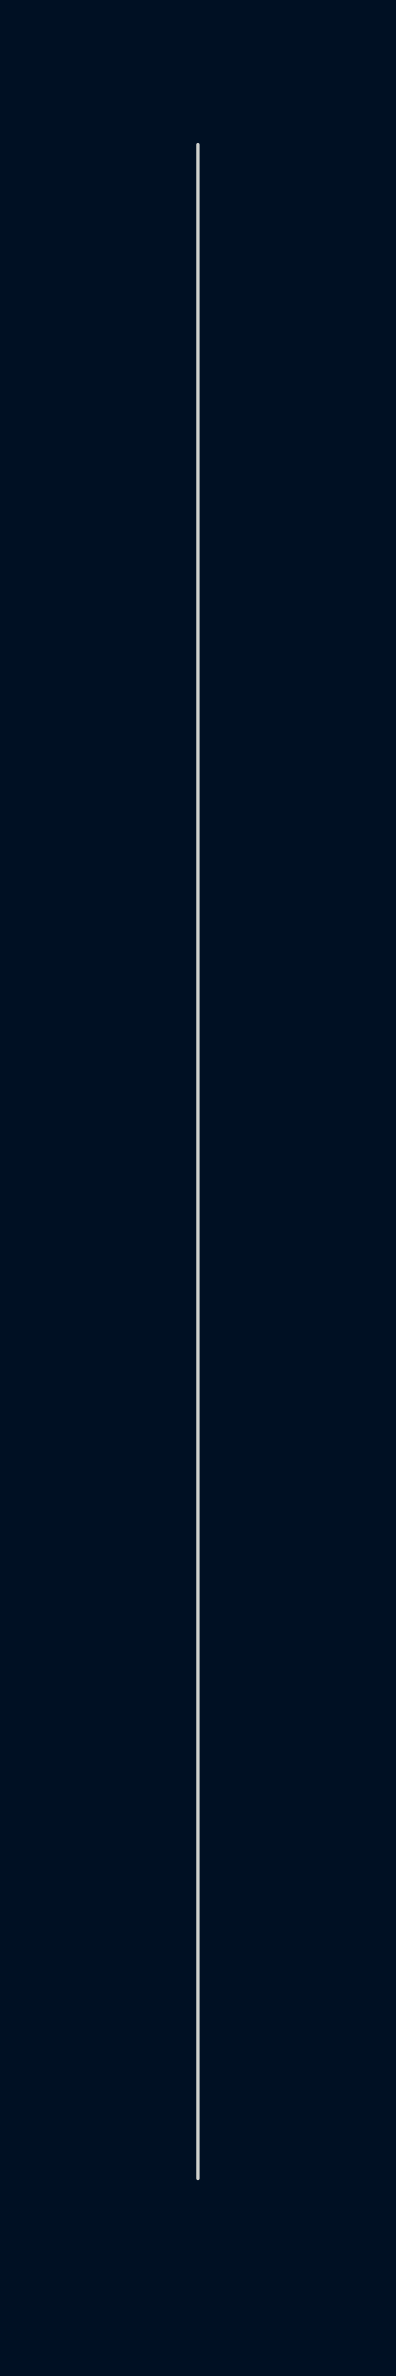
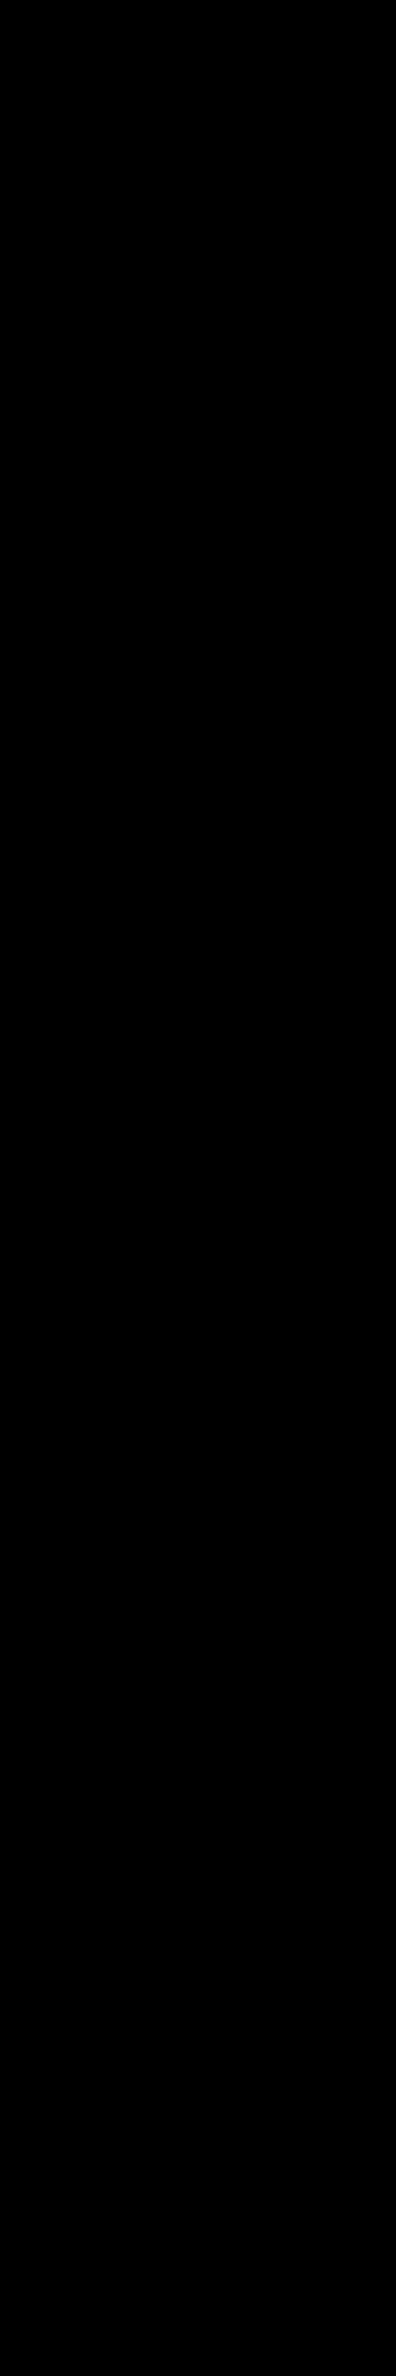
board edge: (197, 144) (197, 2178) -> none

